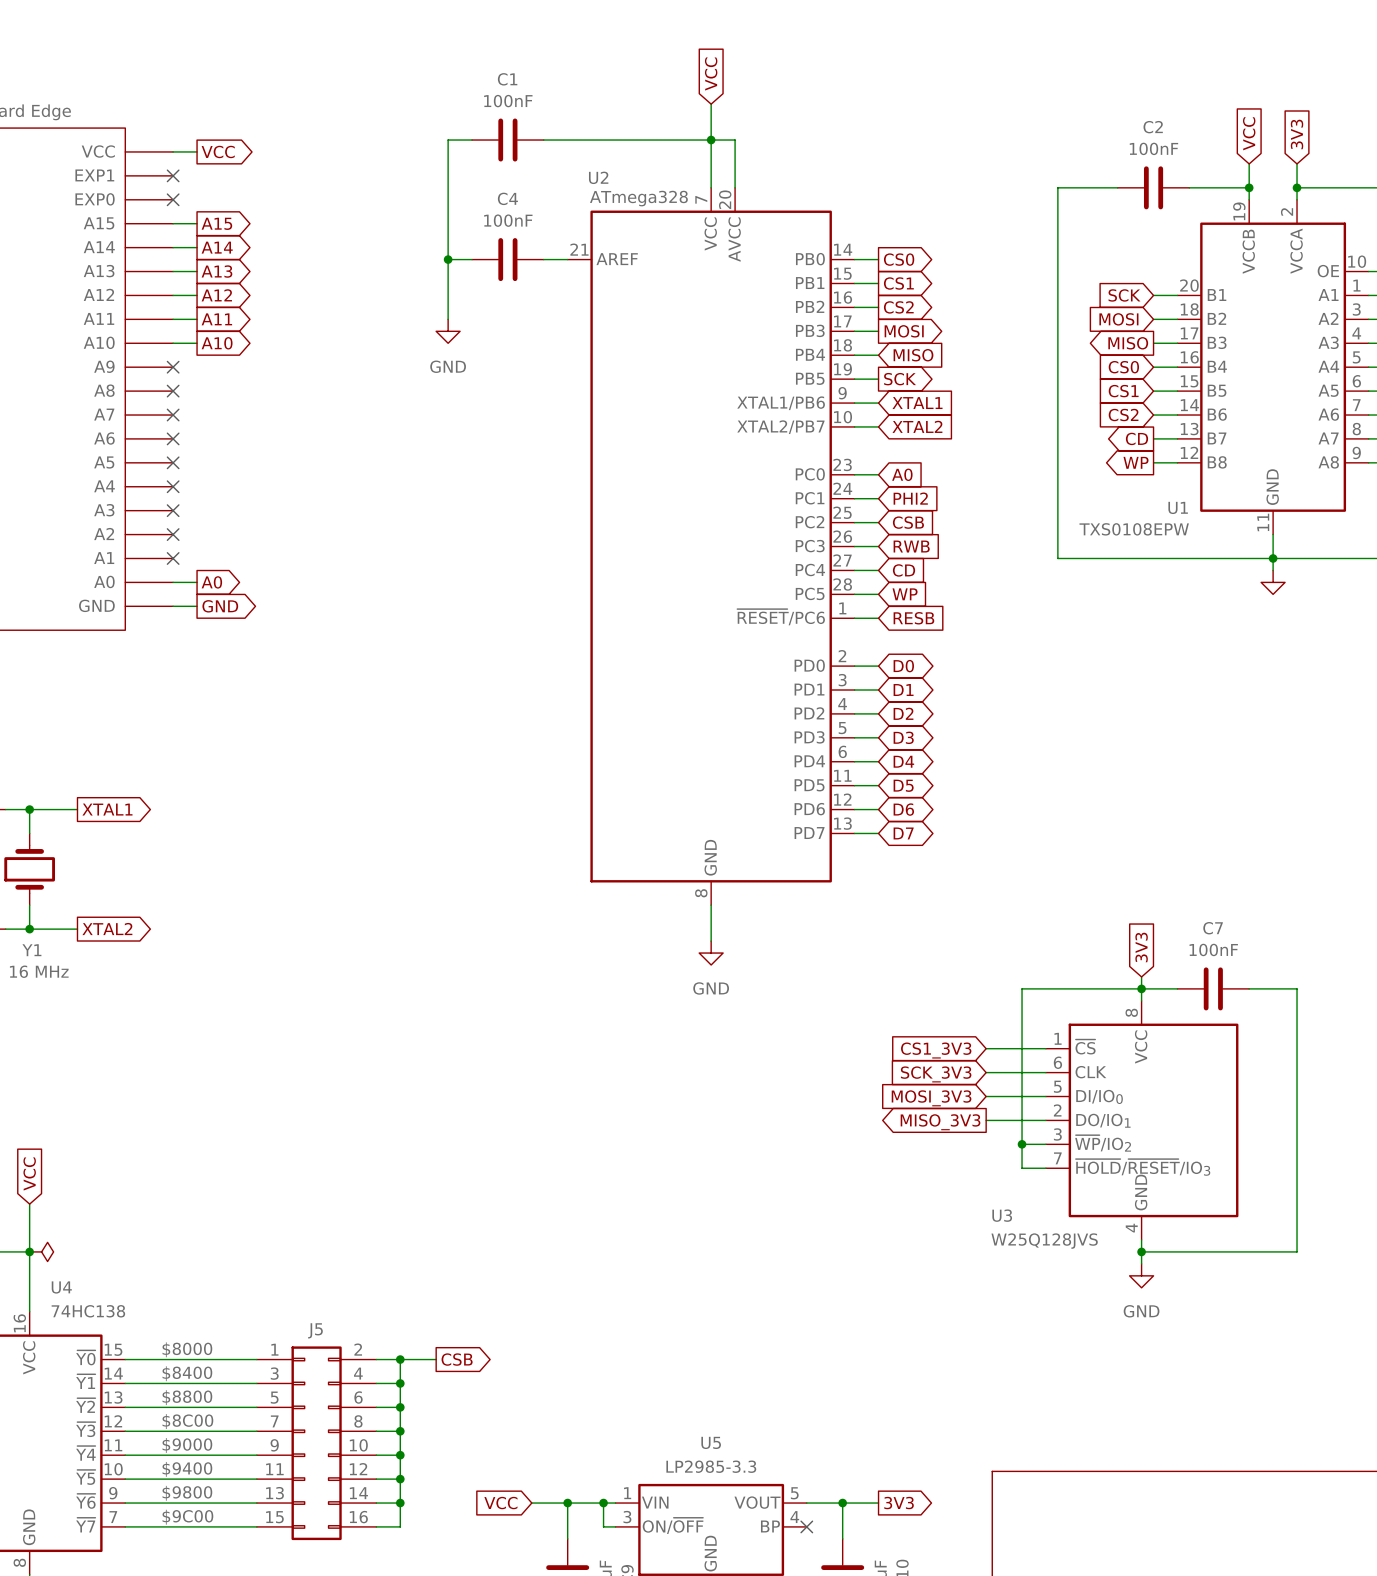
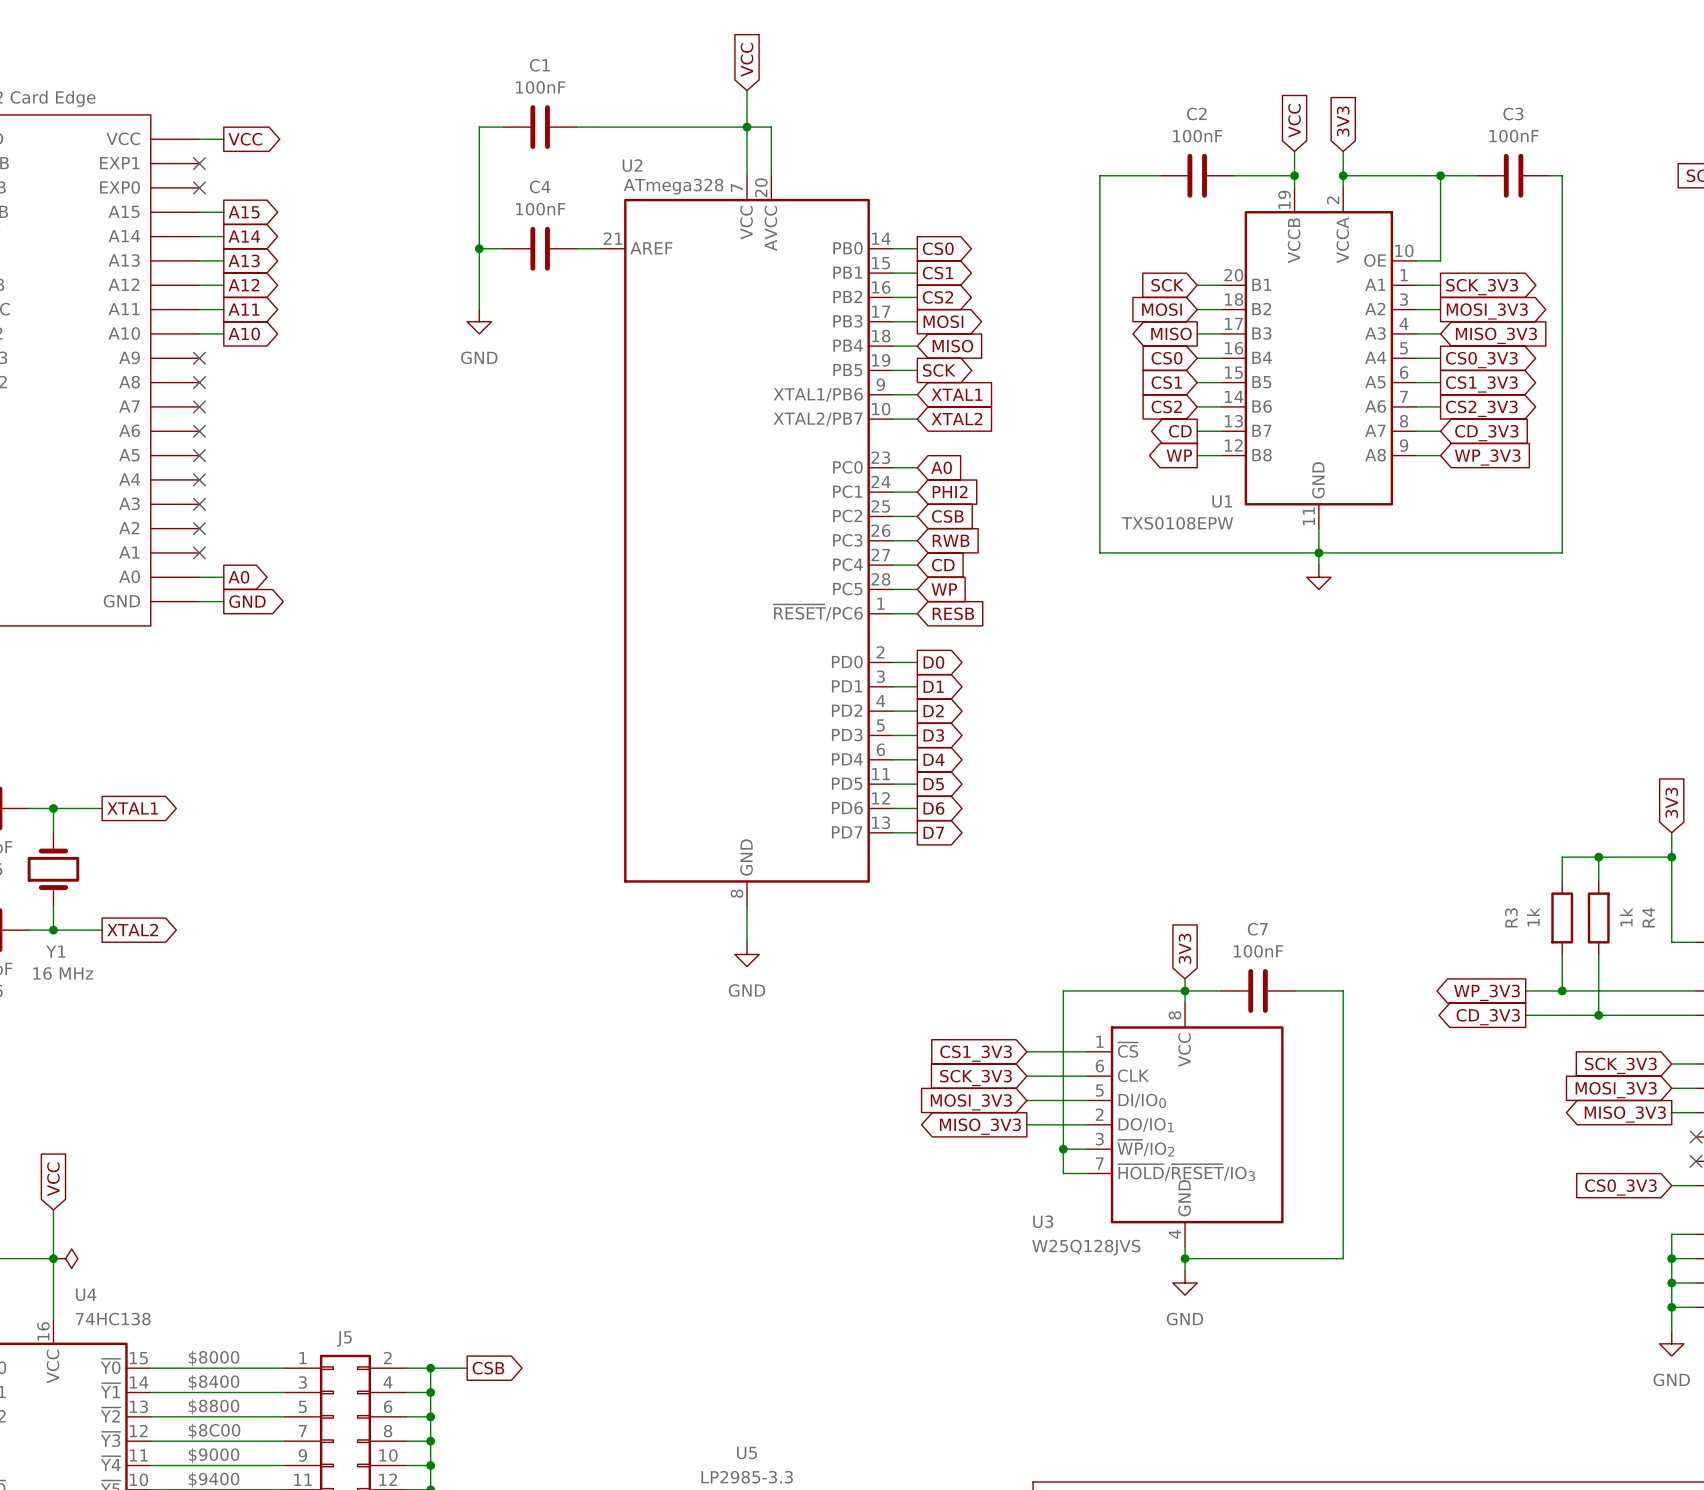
global label shape: bidirectional (903, 666) -> output (933, 662)
global label shape: bidirectional (903, 690) -> output (933, 686)
global label shape: bidirectional (903, 713) -> output (933, 711)
global label shape: bidirectional (903, 737) -> output (933, 735)
global label shape: bidirectional (903, 761) -> output (934, 759)
global label shape: bidirectional (903, 785) -> output (933, 784)
global label shape: bidirectional (903, 809) -> output (933, 808)
global label shape: bidirectional (903, 833) -> output (933, 832)

